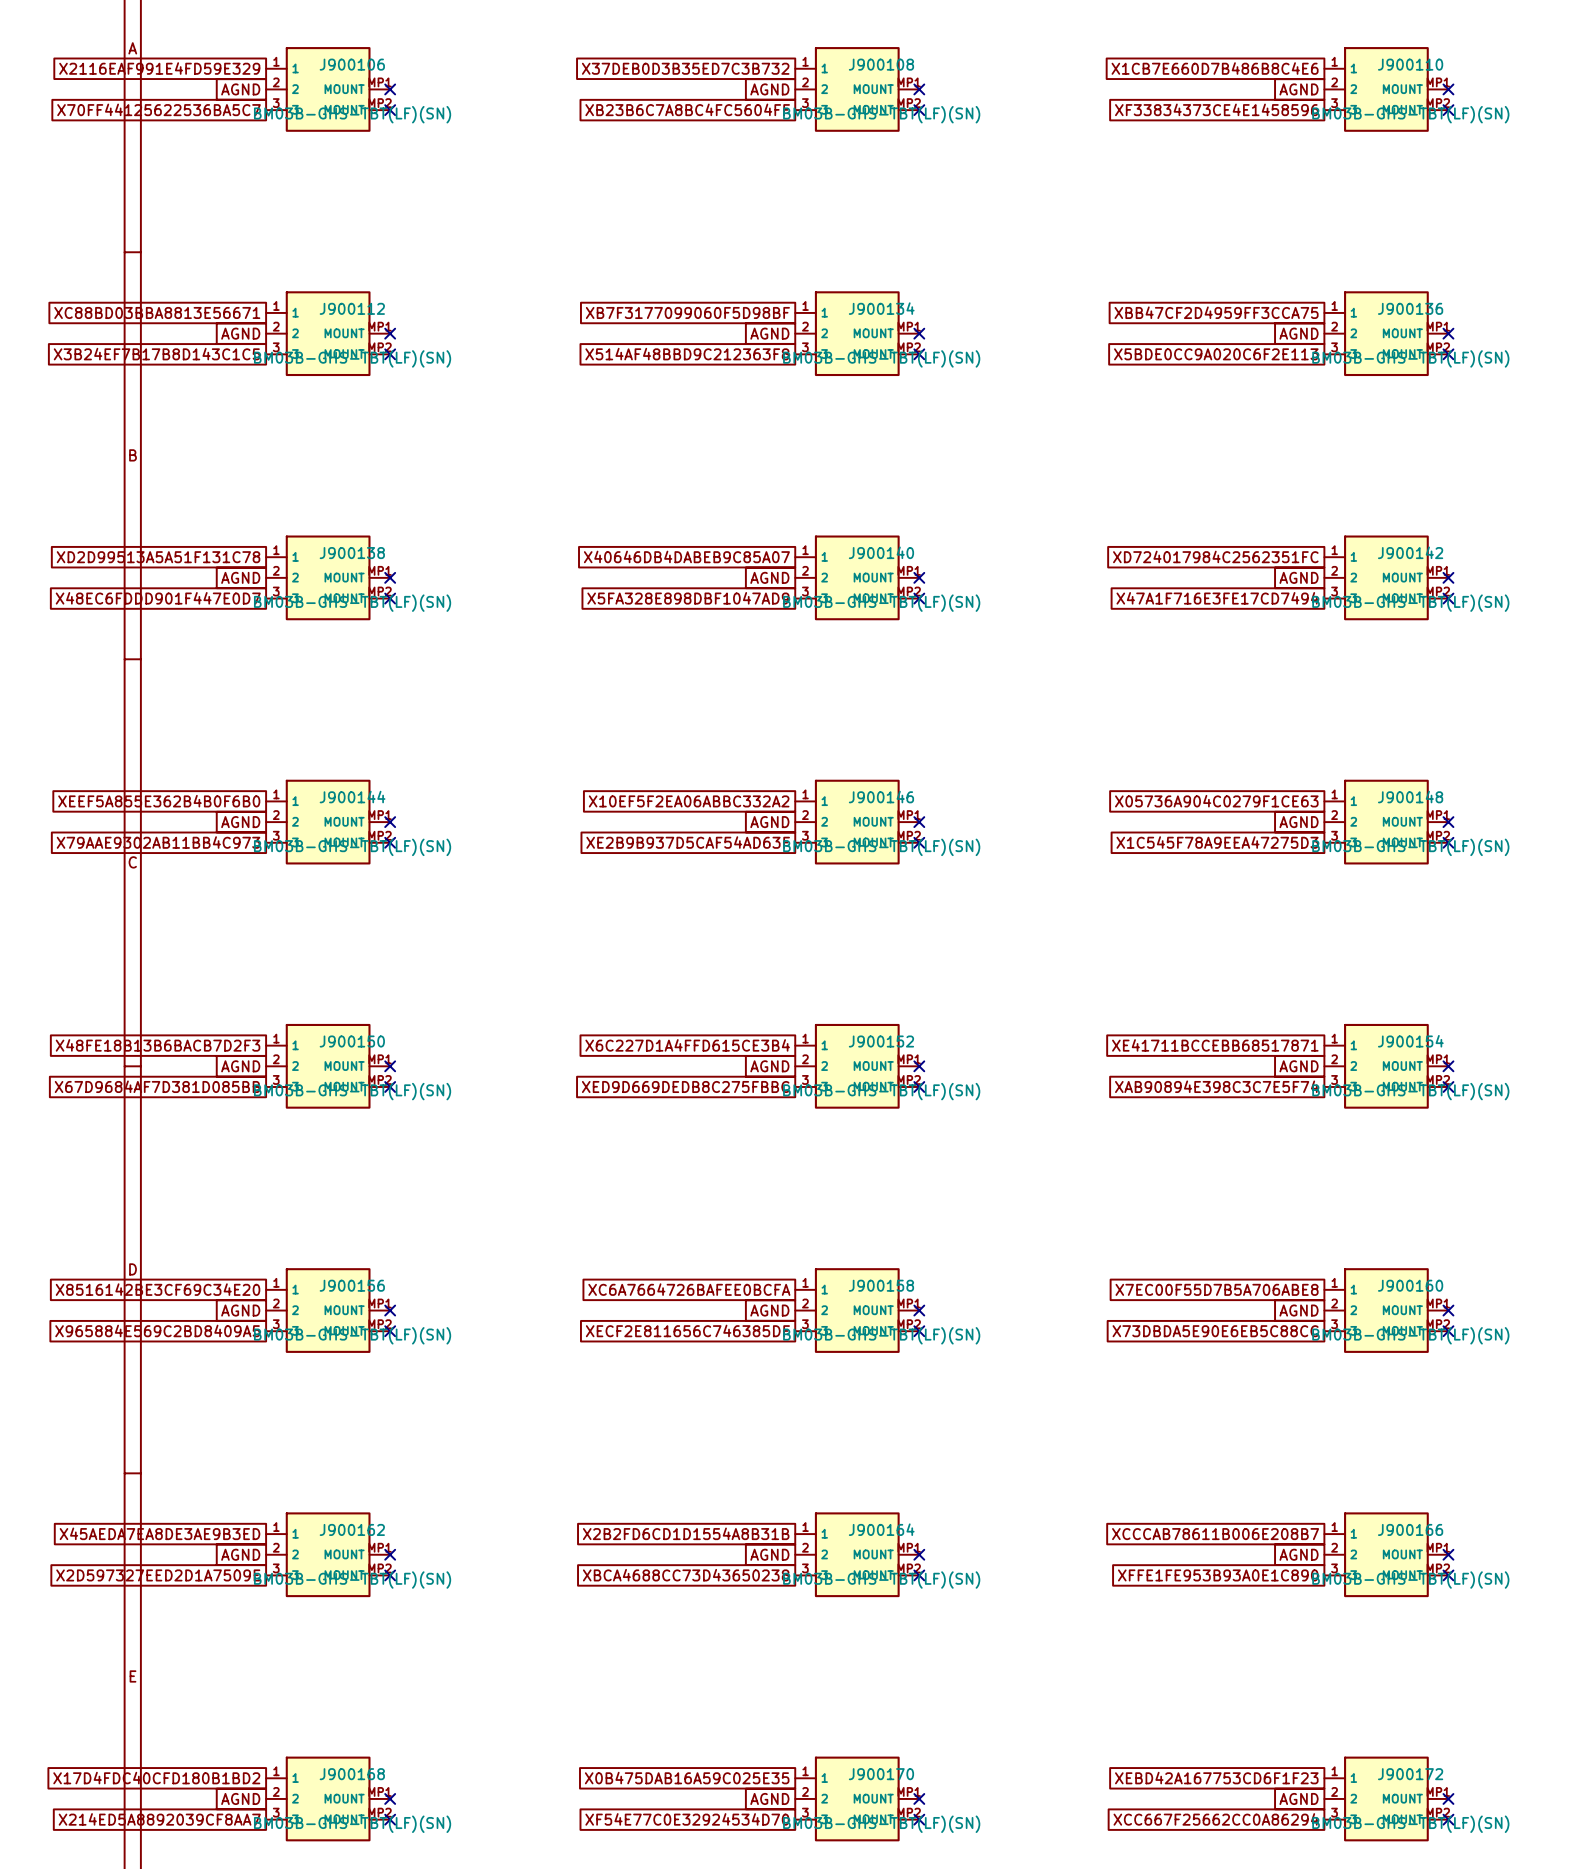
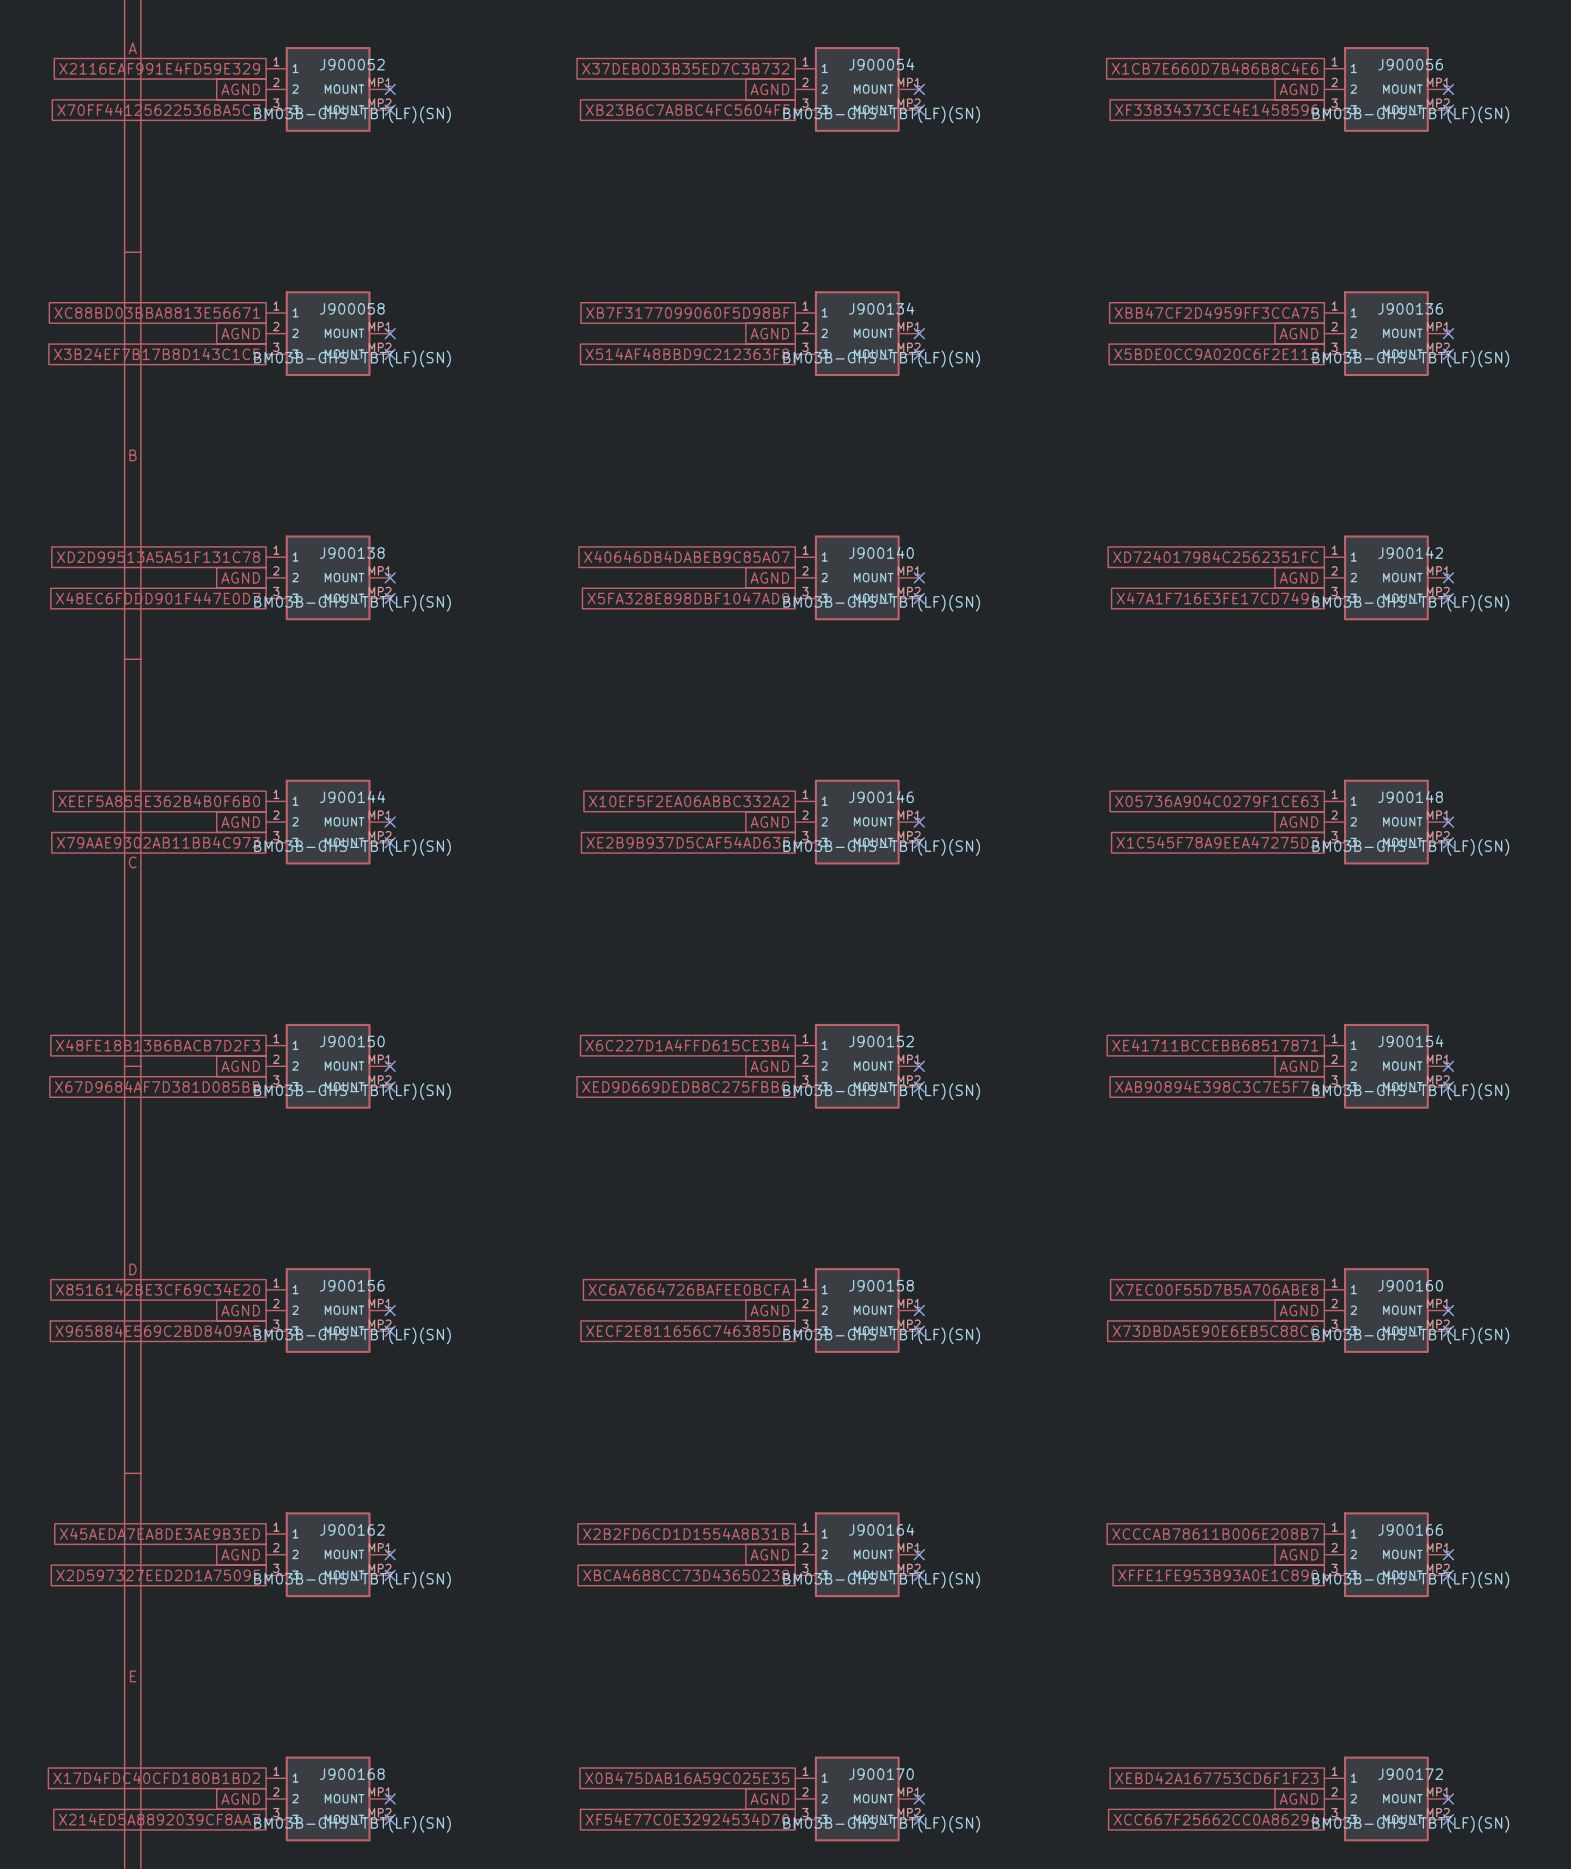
J900106 name: J900106 (352, 64) -> J900052 (352, 64)
J900108 name: J900108 (881, 64) -> J900054 (881, 64)
J900110 name: J900110 (1410, 64) -> J900056 (1410, 64)
J900112 name: J900112 (352, 308) -> J900058 (352, 308)

